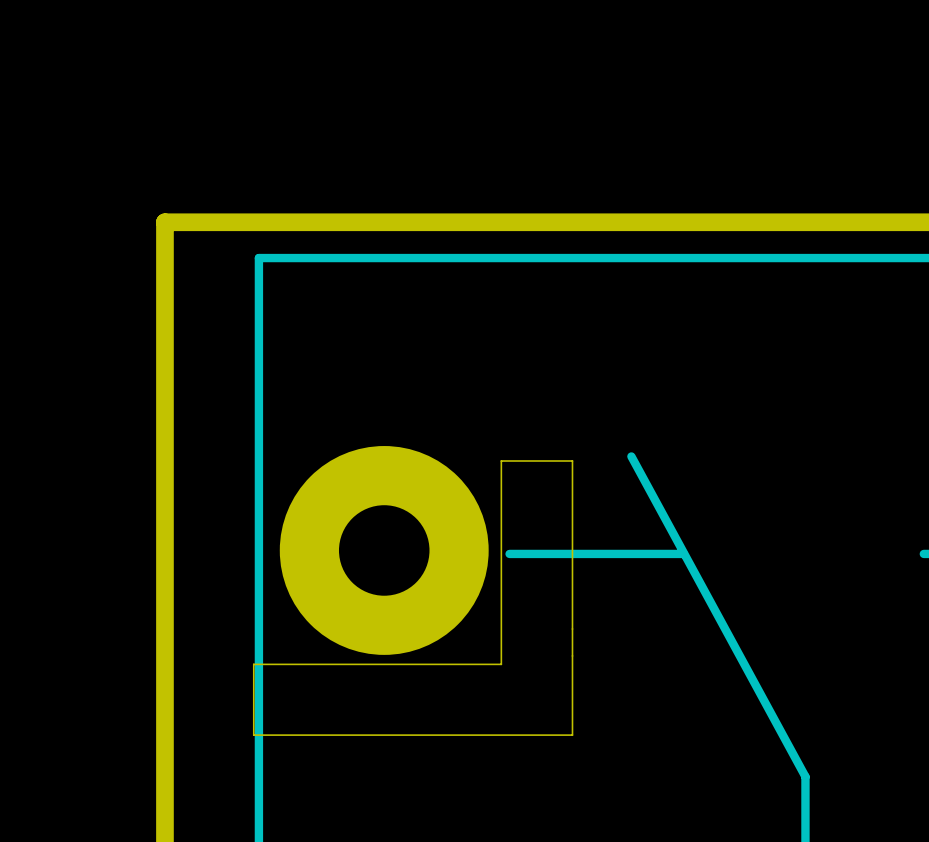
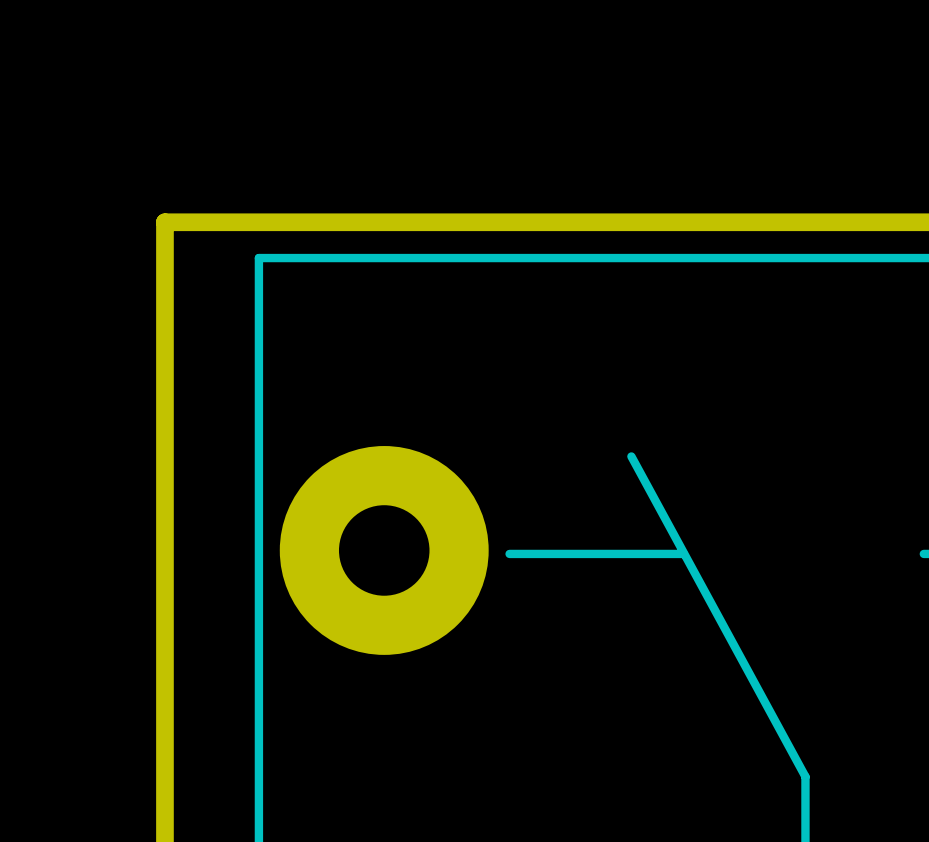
board edge: (501, 461) (501, 664) (253, 664) (253, 735) (572, 735) (572, 461) (501, 461) -> none

